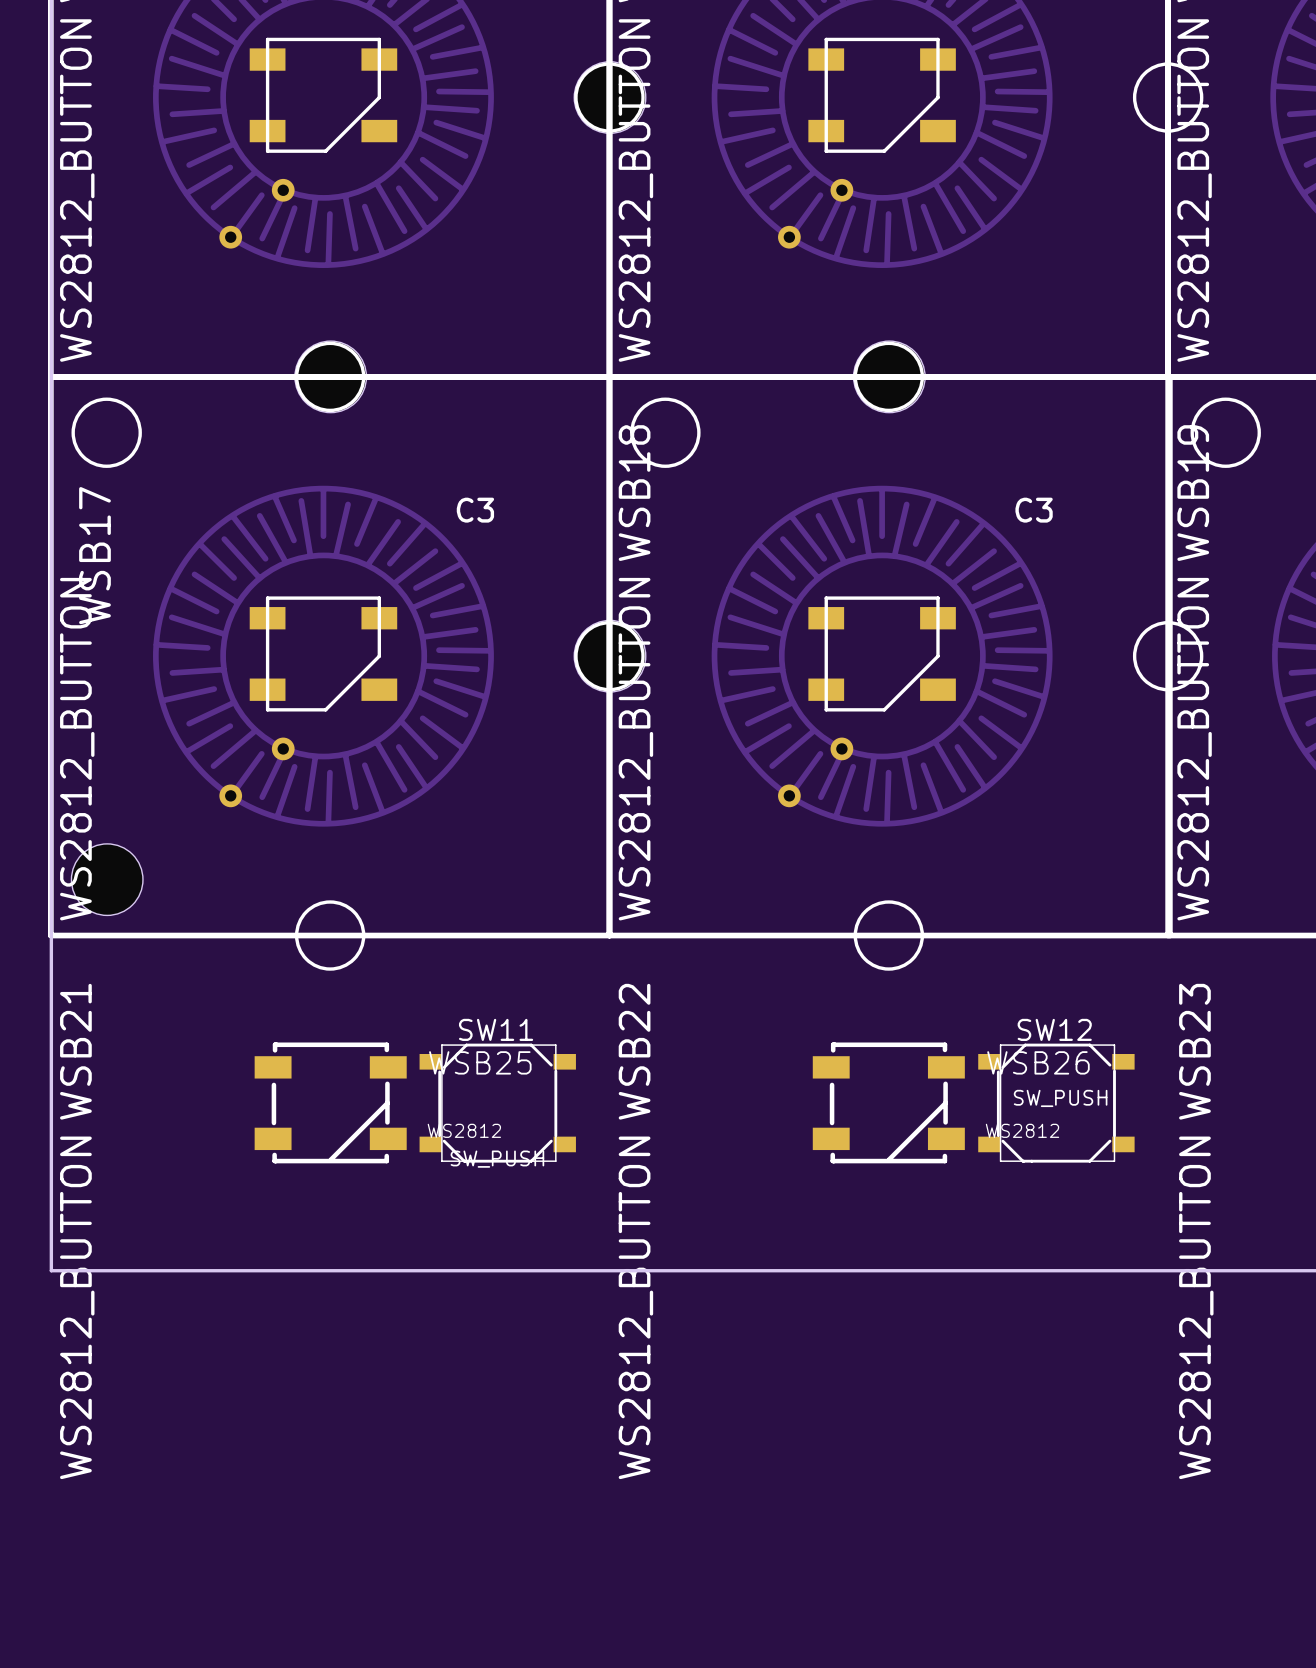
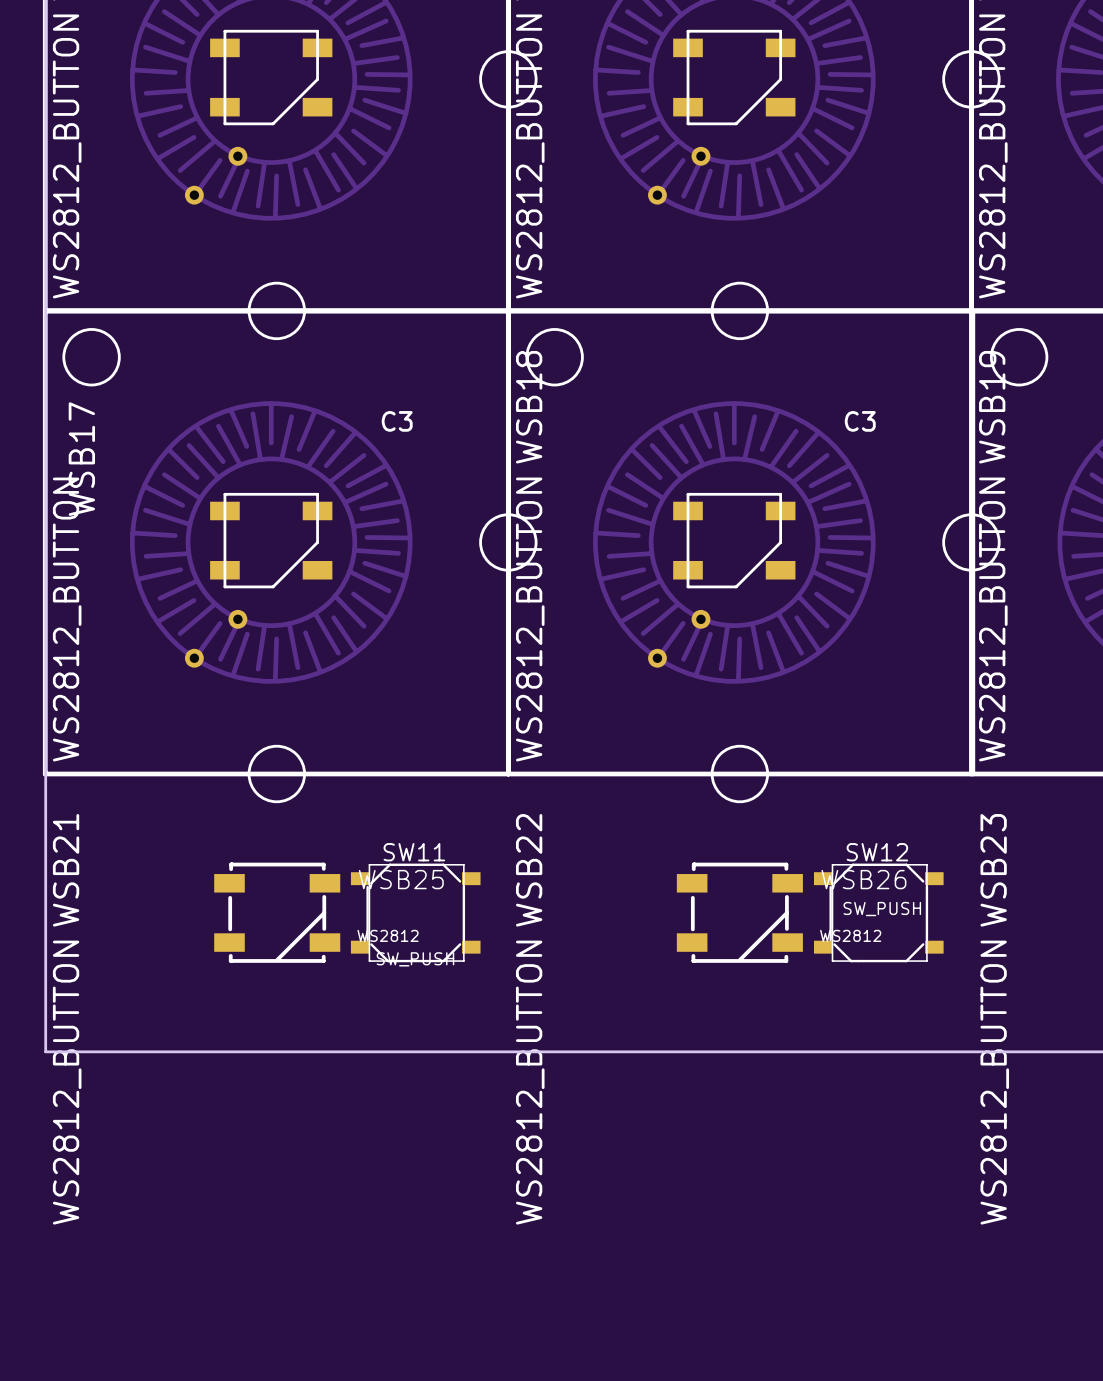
part: (610, 97) -> none
part: (330, 376) -> none
part: (889, 376) -> none
part: (610, 656) -> none
part: (107, 879) -> none

